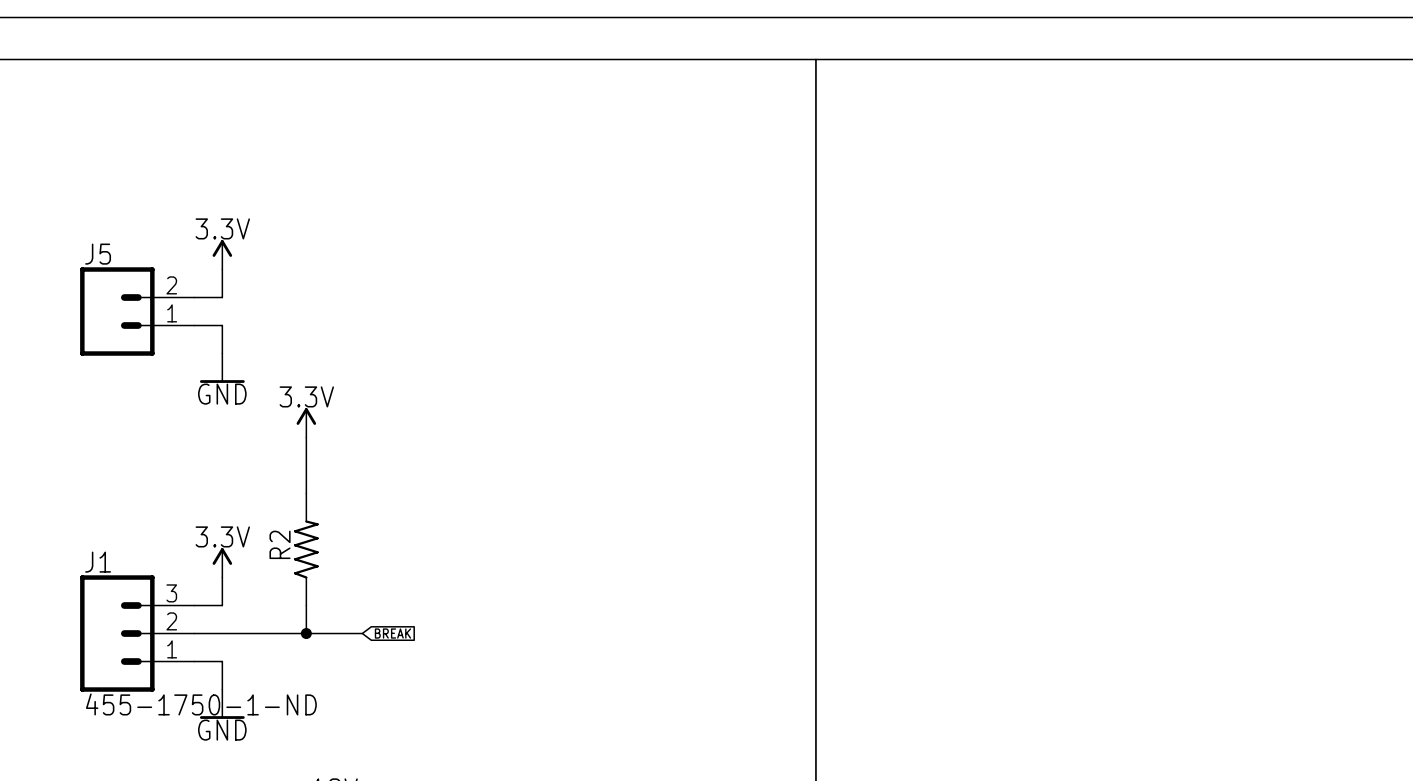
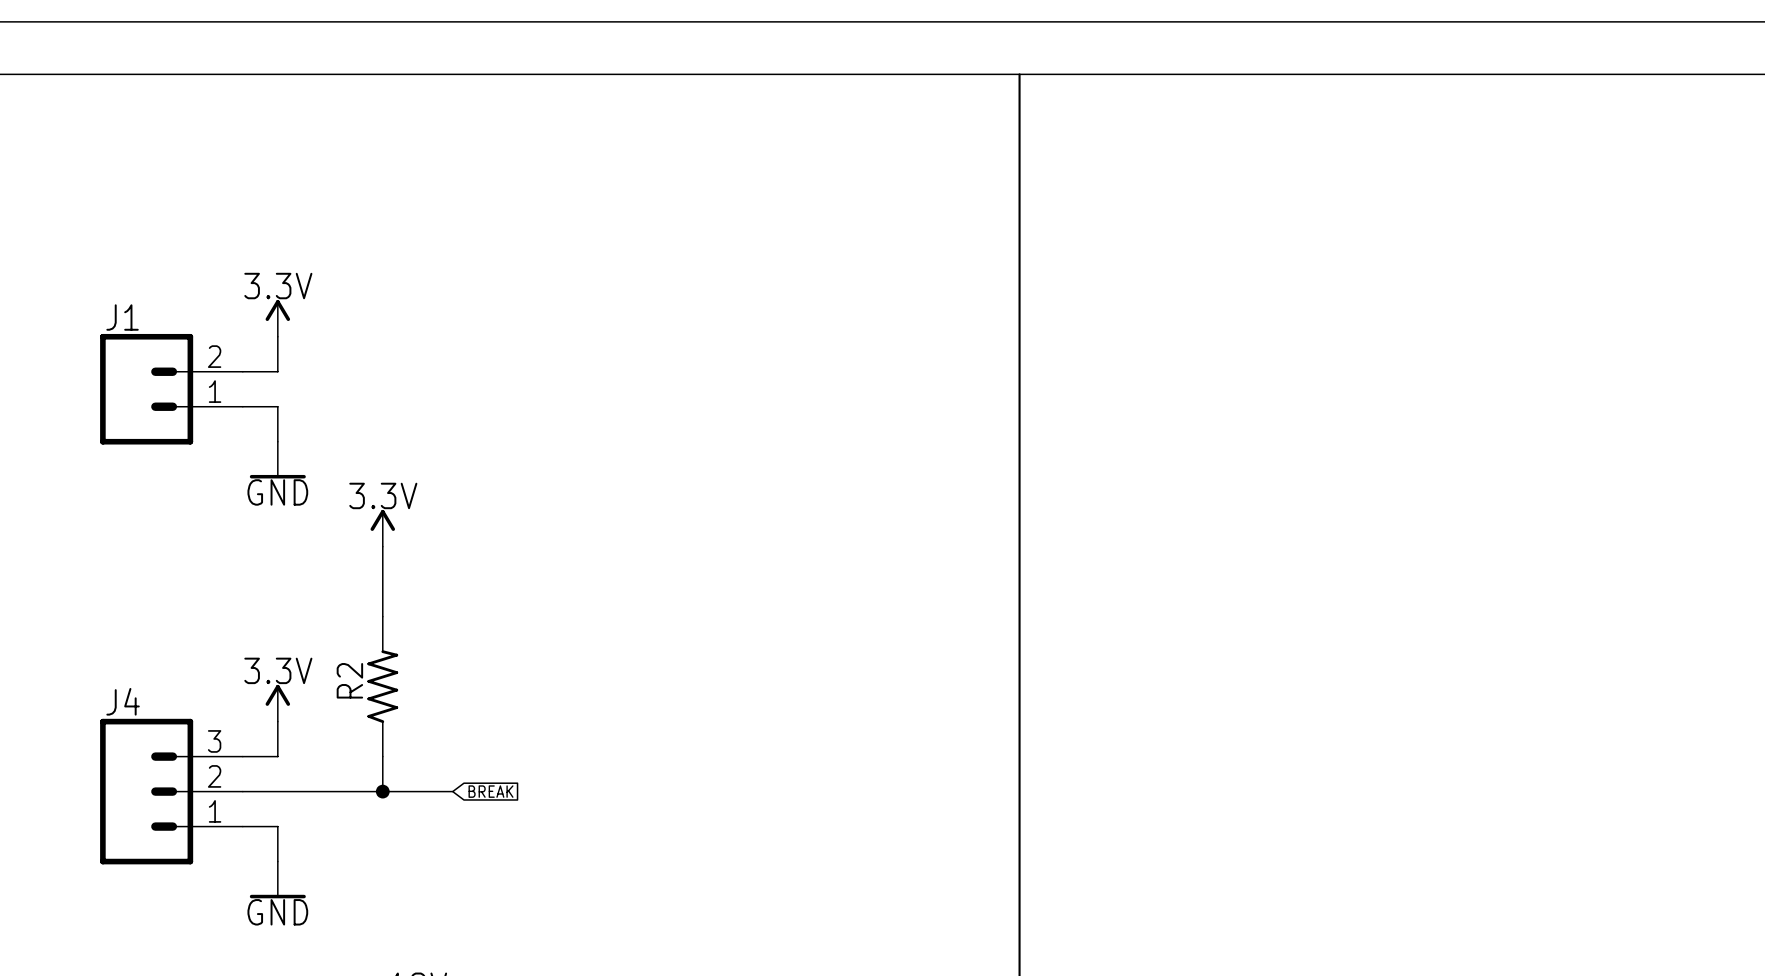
J5 name: J5 (98, 254) -> J1 (122, 317)
J1 name: J1 (98, 562) -> J4 (123, 701)
J1 value: 455-1750-1-ND (201, 704) -> none

